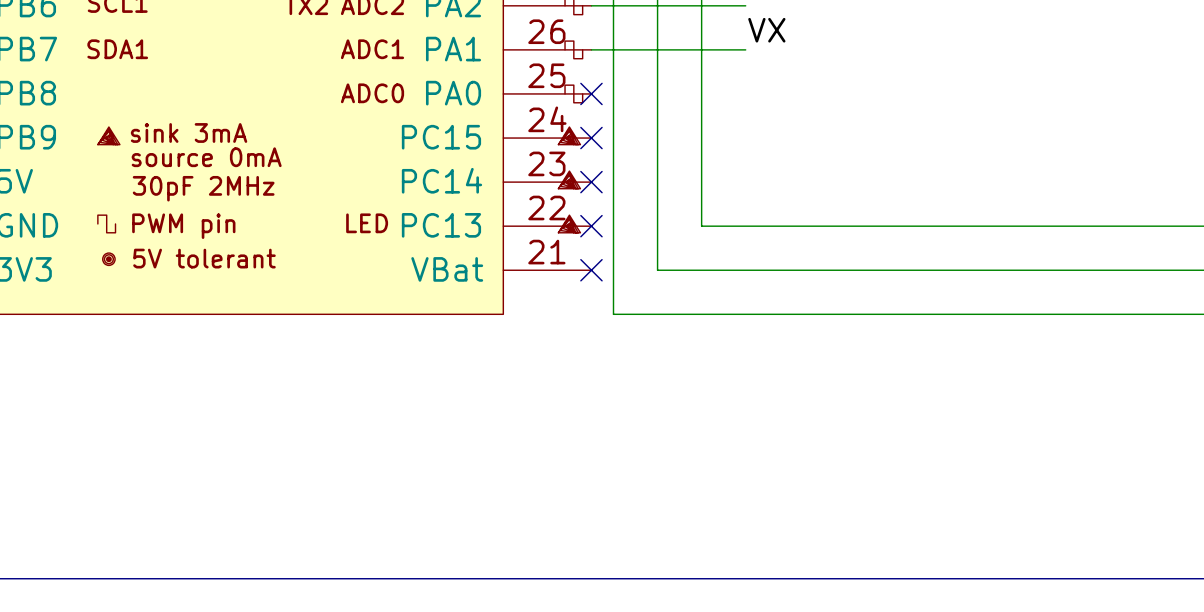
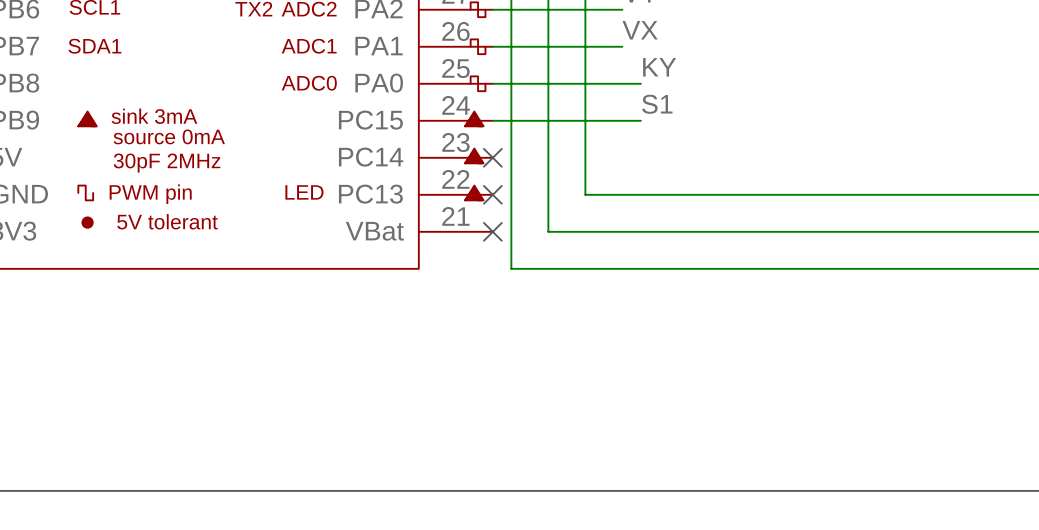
label: none -> KY (659, 67)
wire: none -> (492, 83) (640, 83)
no-connect mark: (591, 93) -> none
label: none -> S1 (657, 104)
wire: none -> (492, 120) (640, 120)
no-connect mark: (591, 138) -> none

